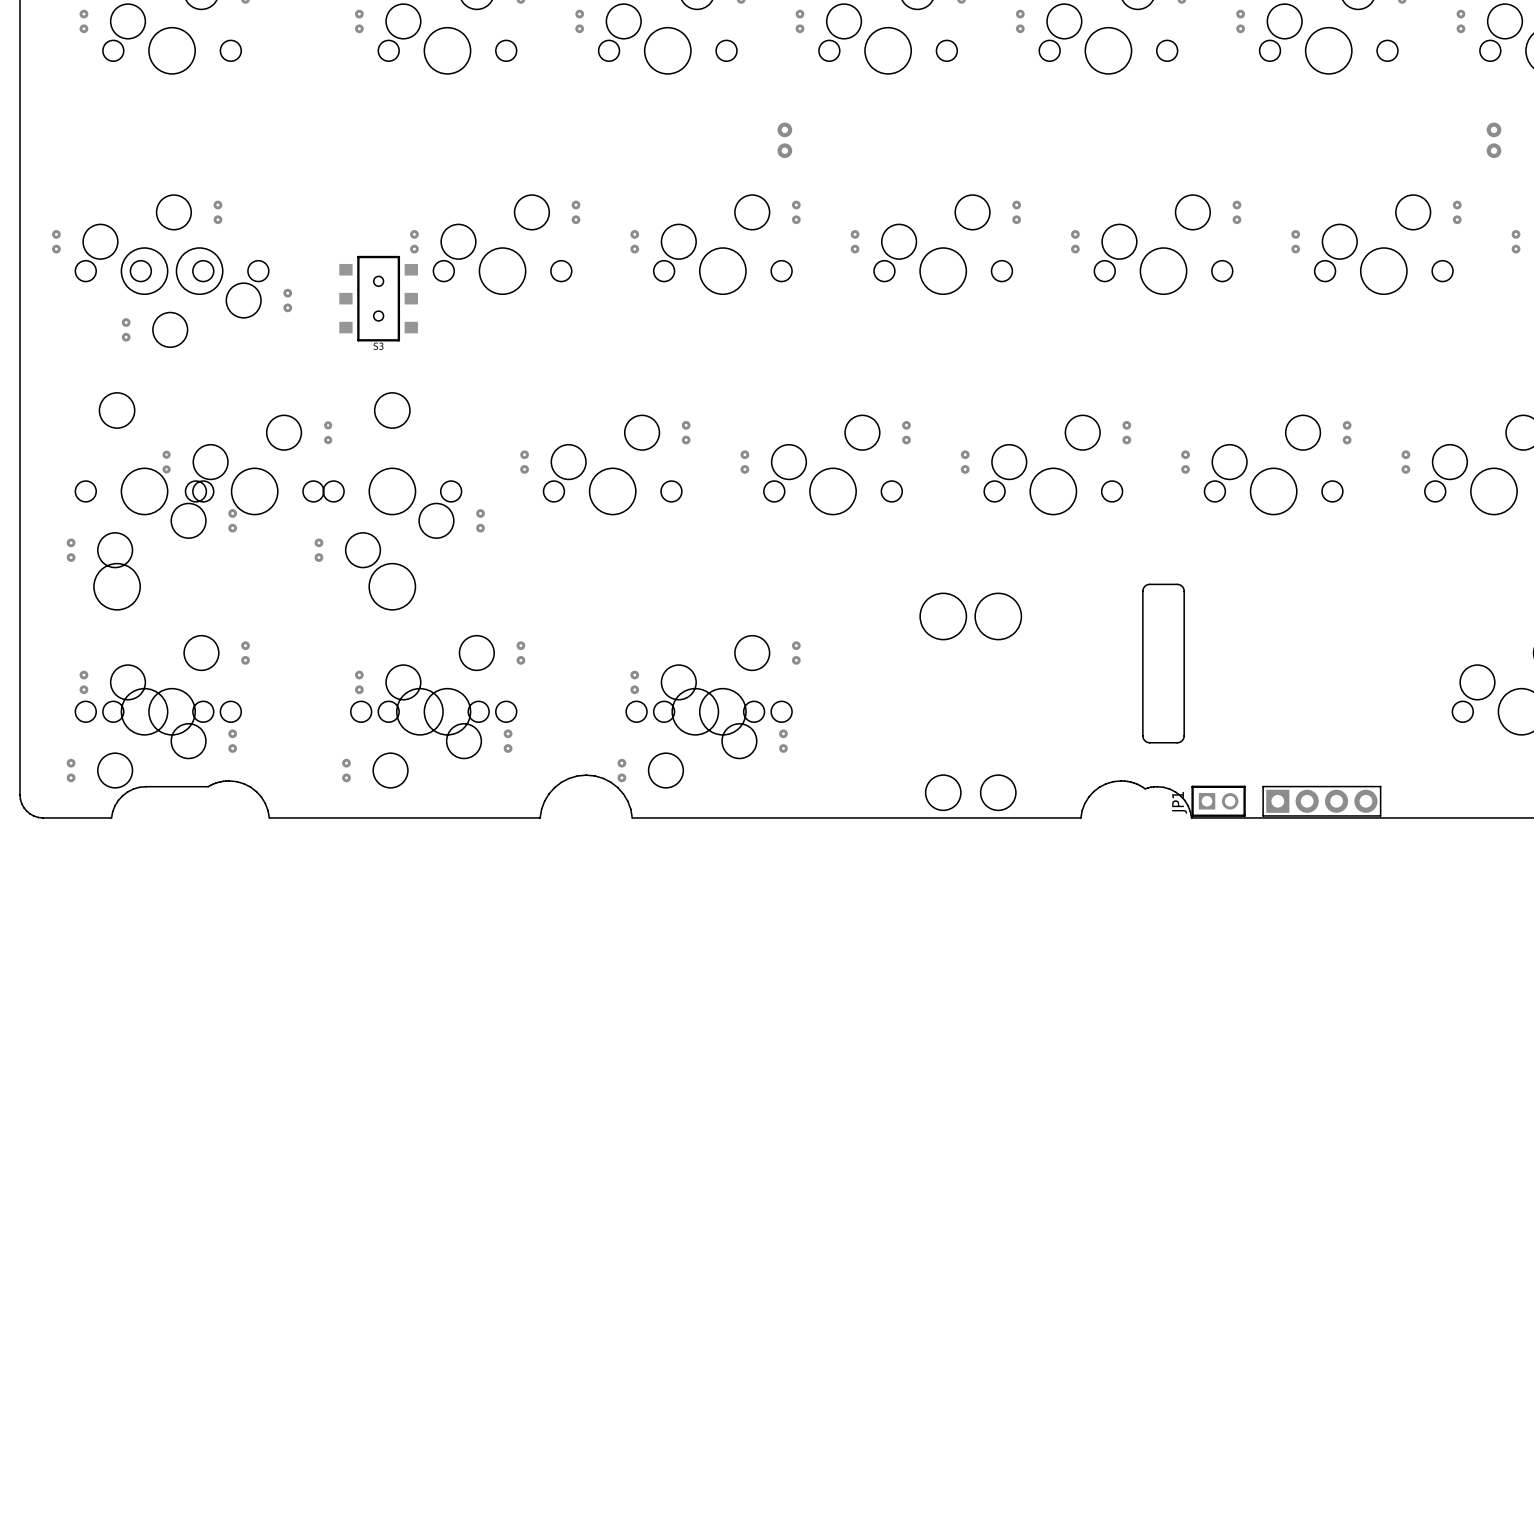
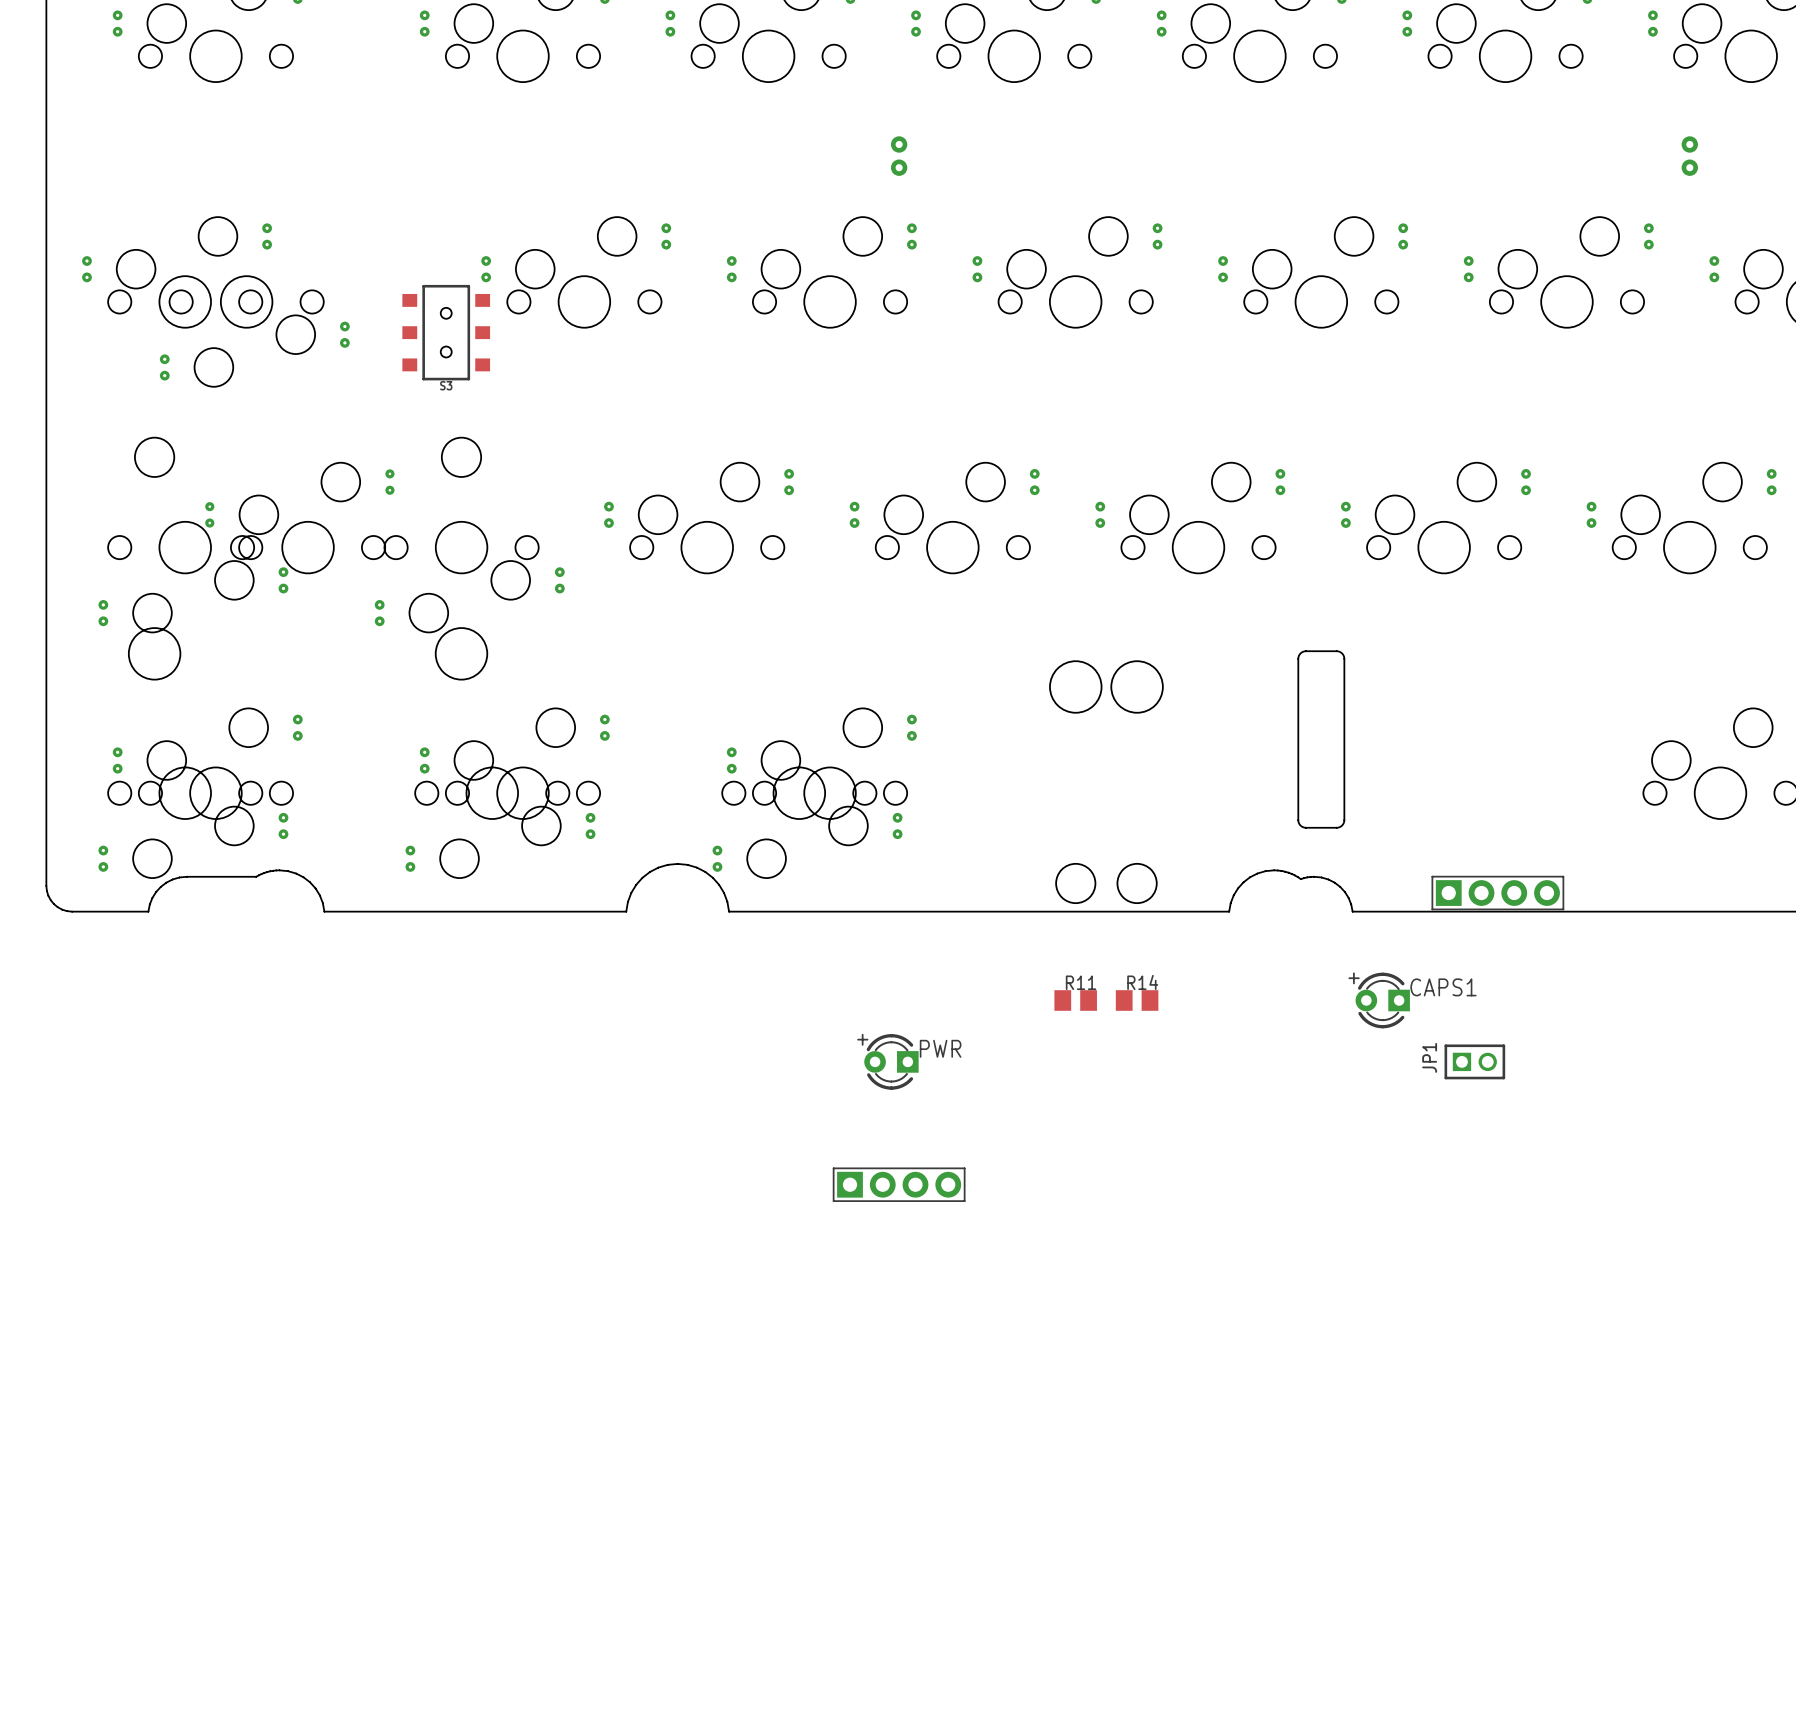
JP1 position: (1218, 801) -> (1474, 1061)
R11: none -> (1075, 1000)
R14: none -> (1137, 1000)
CAPS1: none -> (1379, 1000)
PWR: none -> (887, 1061)
part: none -> (899, 1184)

